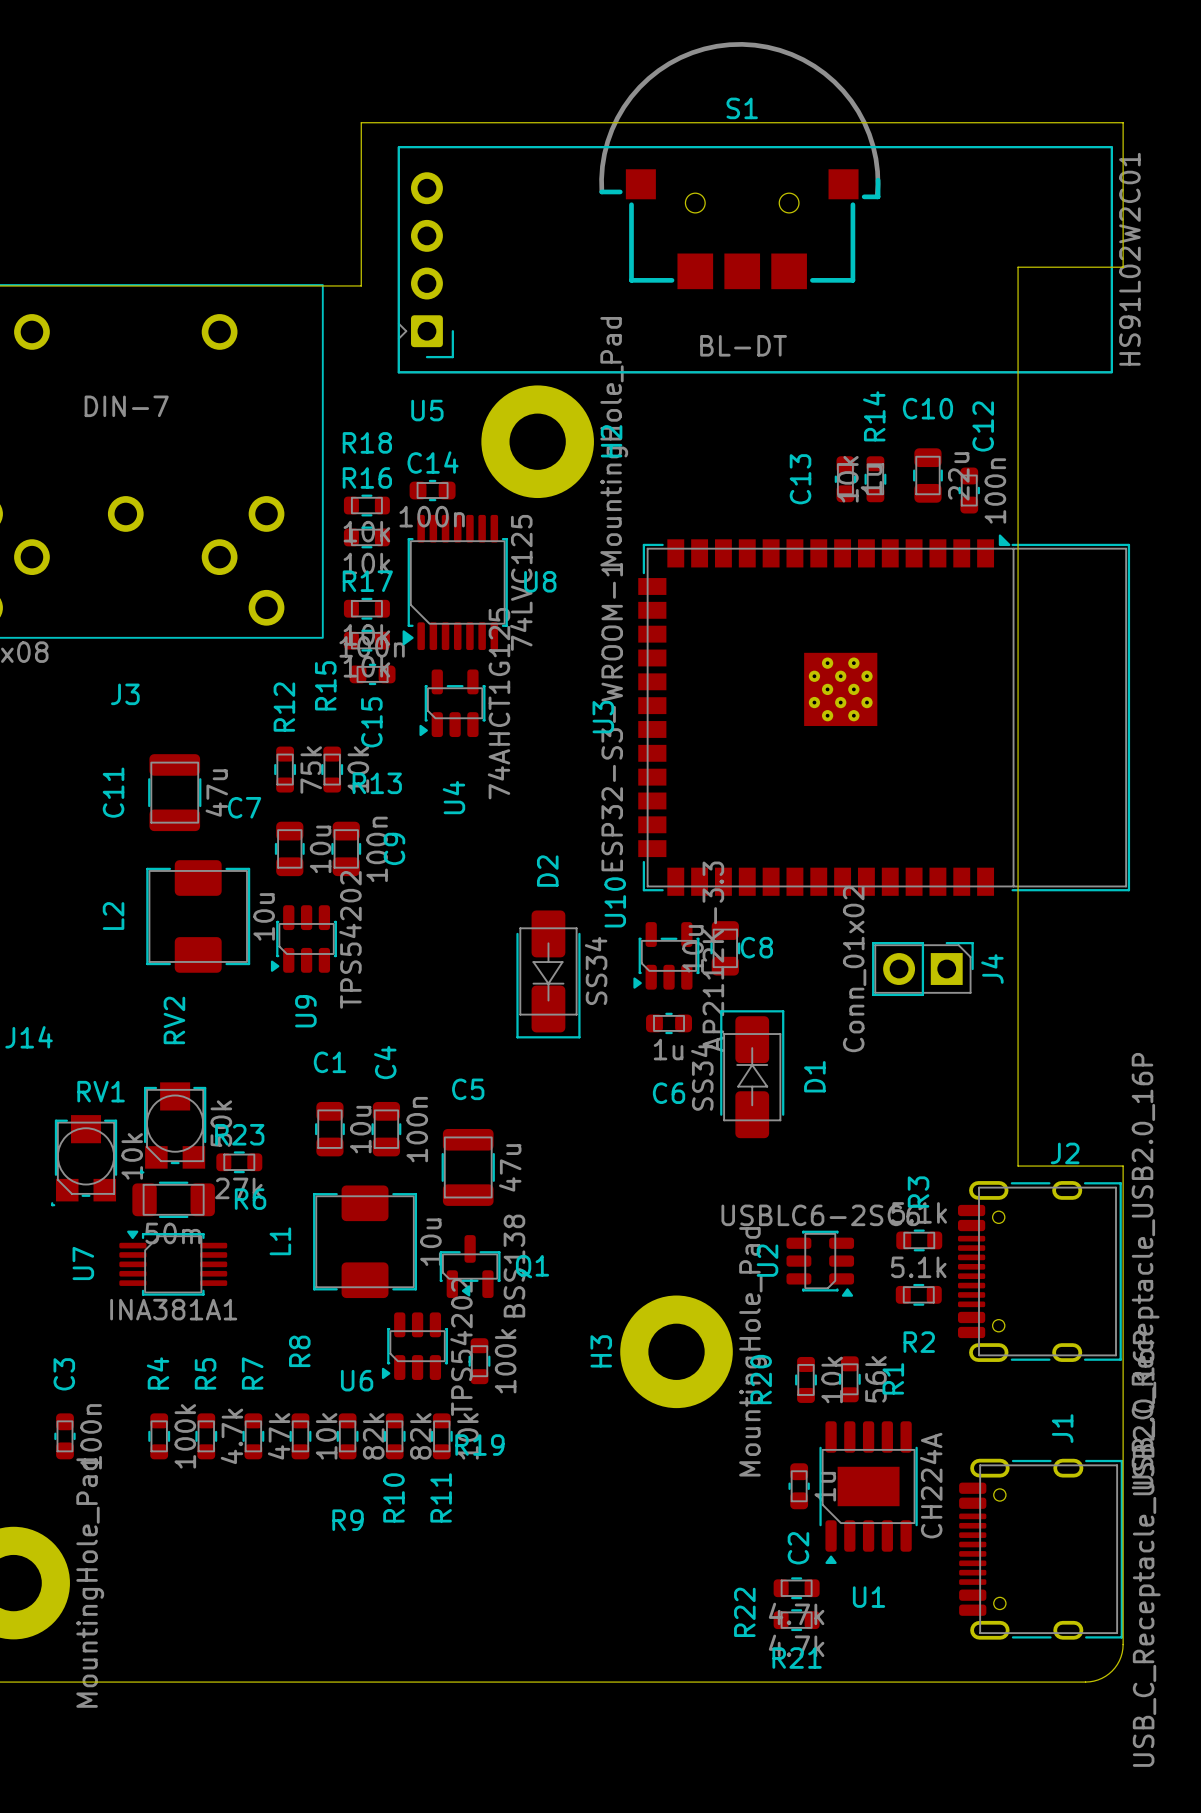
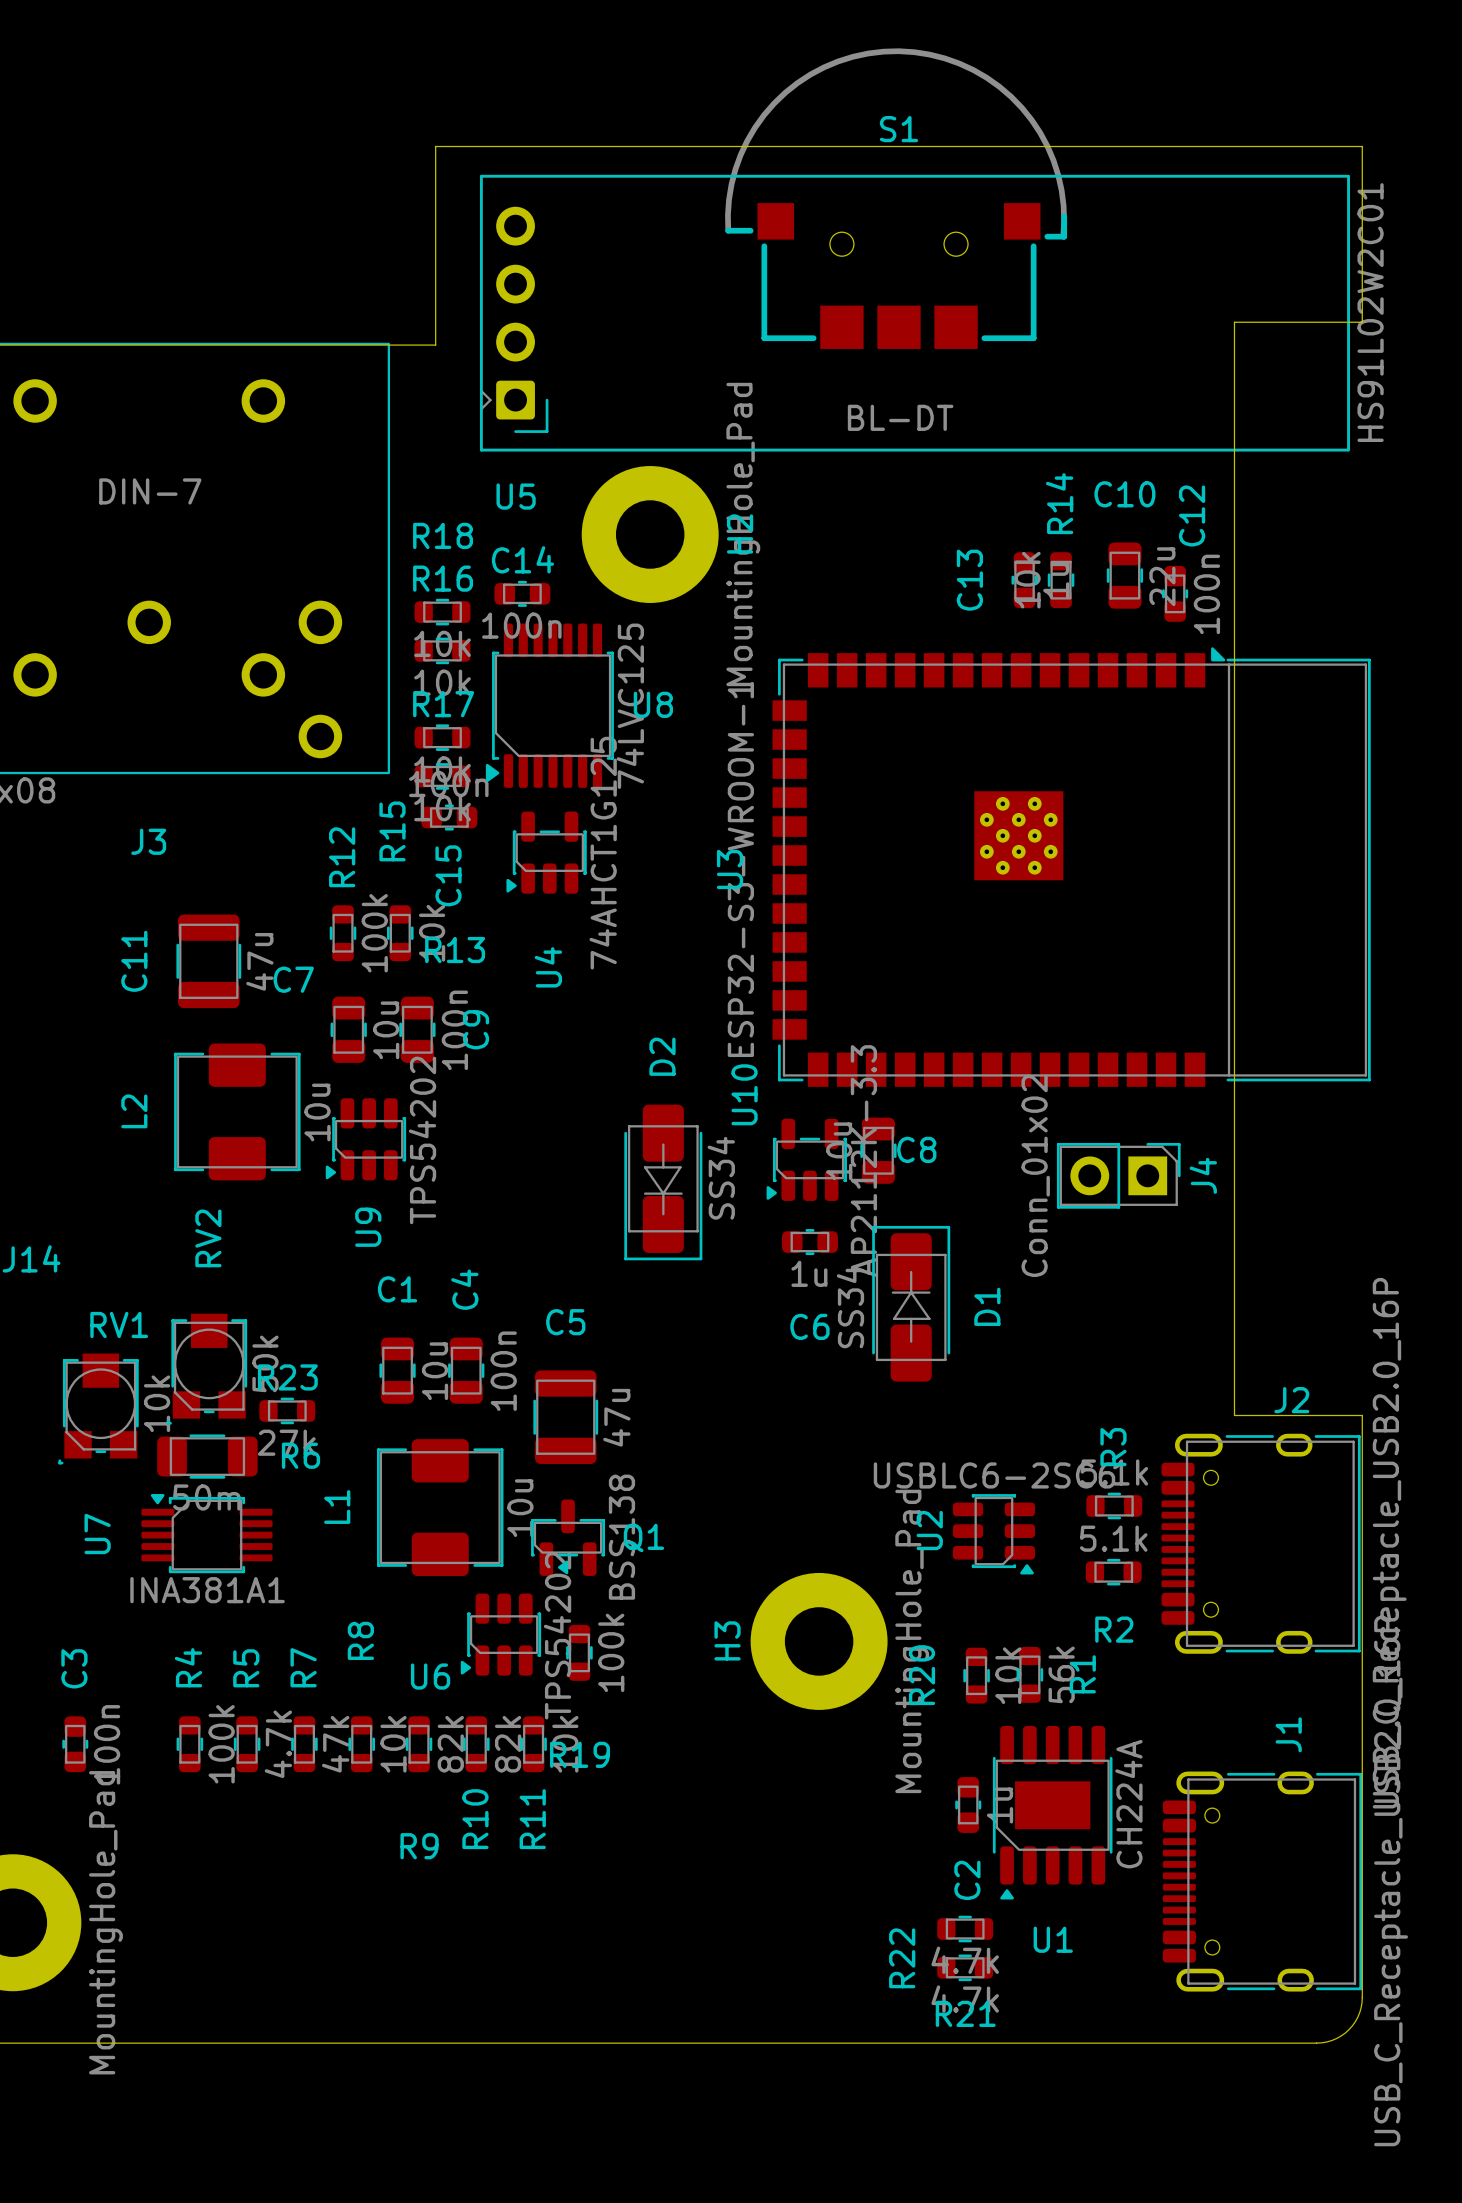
R12 value: 75k (311, 769) -> 100k (374, 933)

